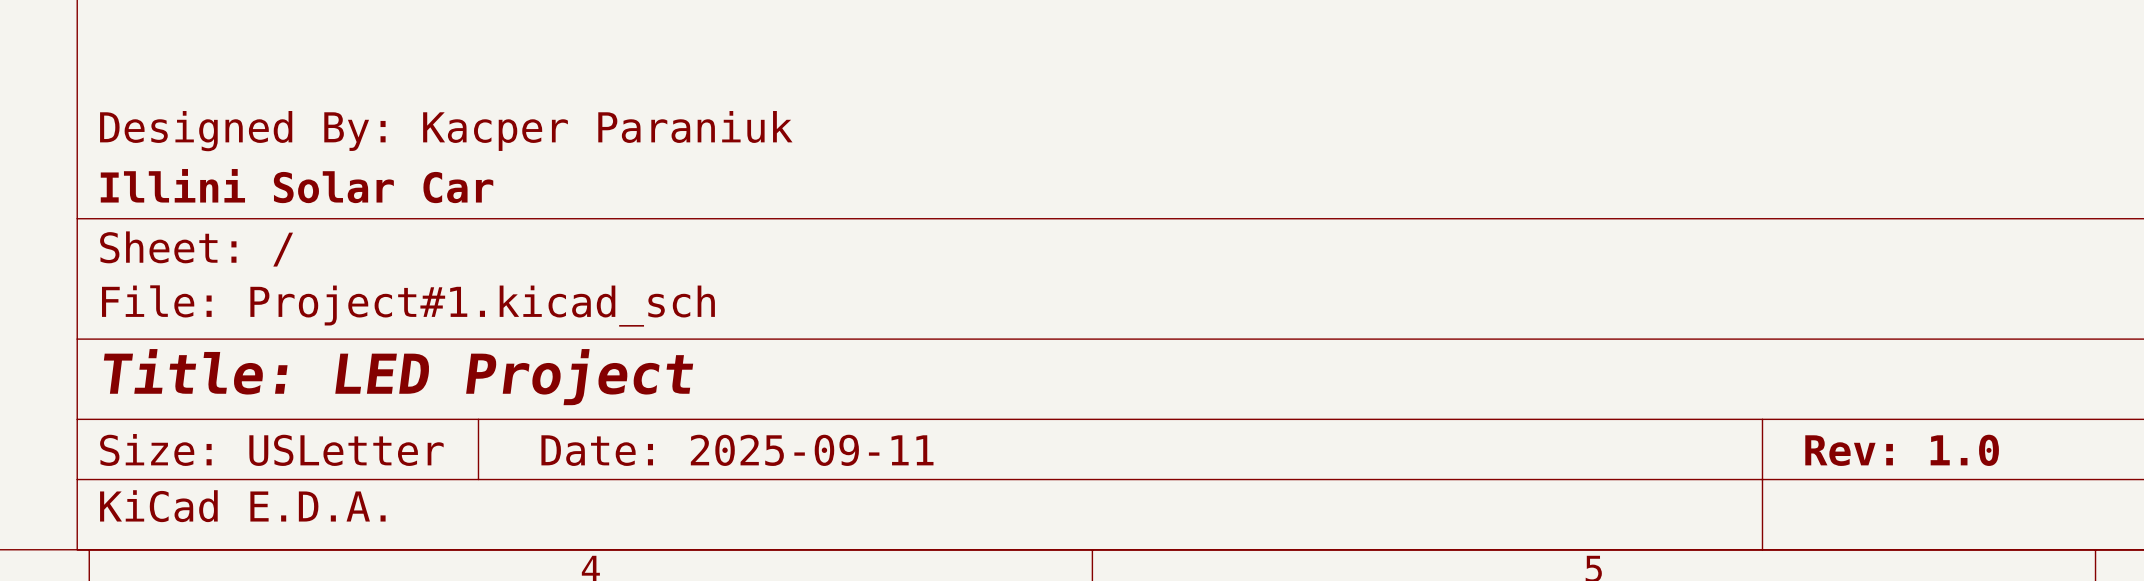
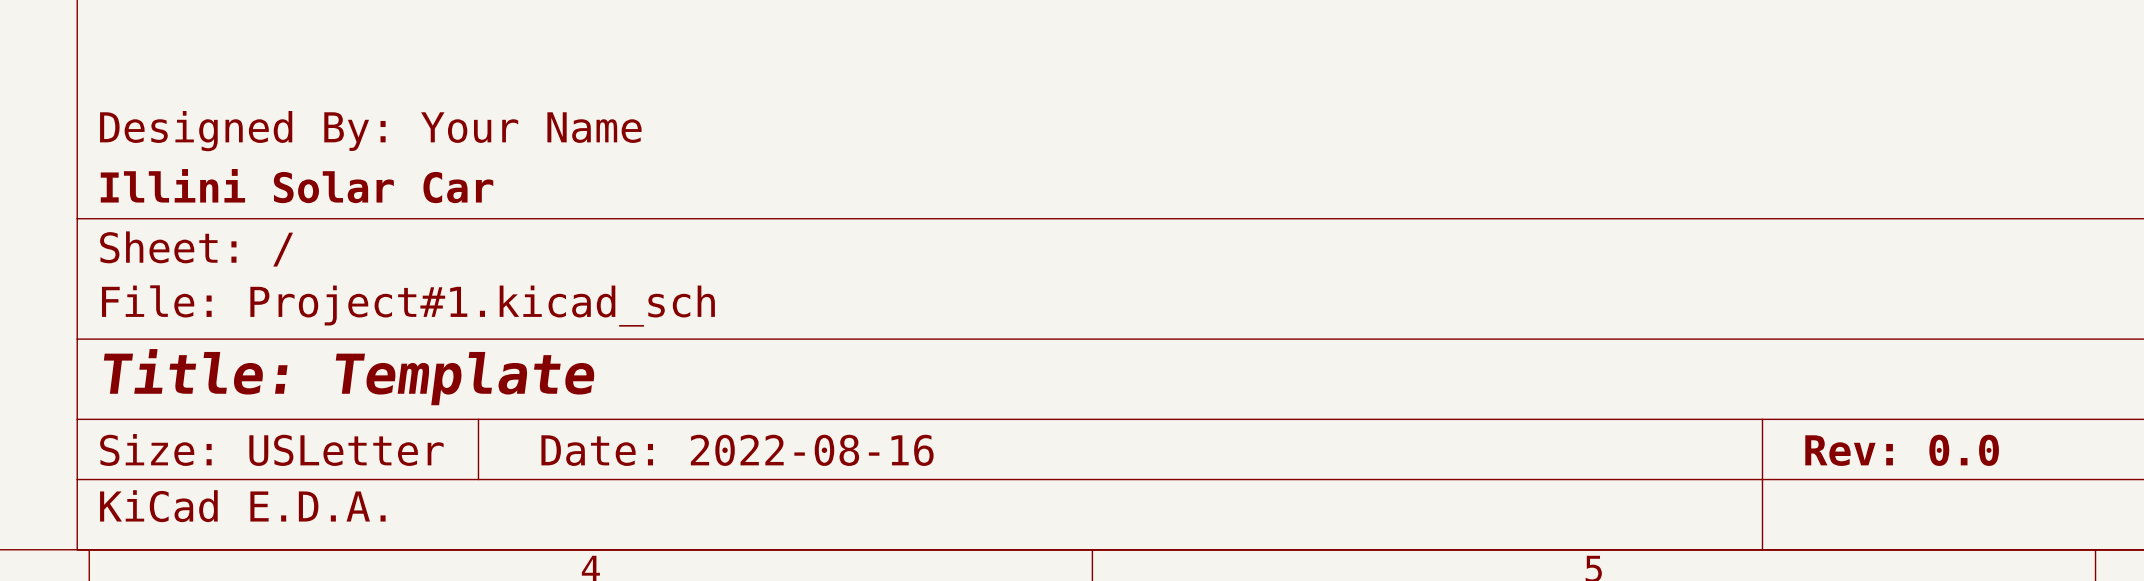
title block: Designed By: Kacper Paraniuk (446, 131) -> Designed By: Your Name (370, 131)
title block: Title: LED Project (398, 377) -> Title: Template (349, 377)
title block: Date: 2025-09-11 (737, 450) -> Date: 2022-08-16 (737, 450)
title block: Rev: 1.0 (1902, 450) -> Rev: 0.0 (1902, 450)

